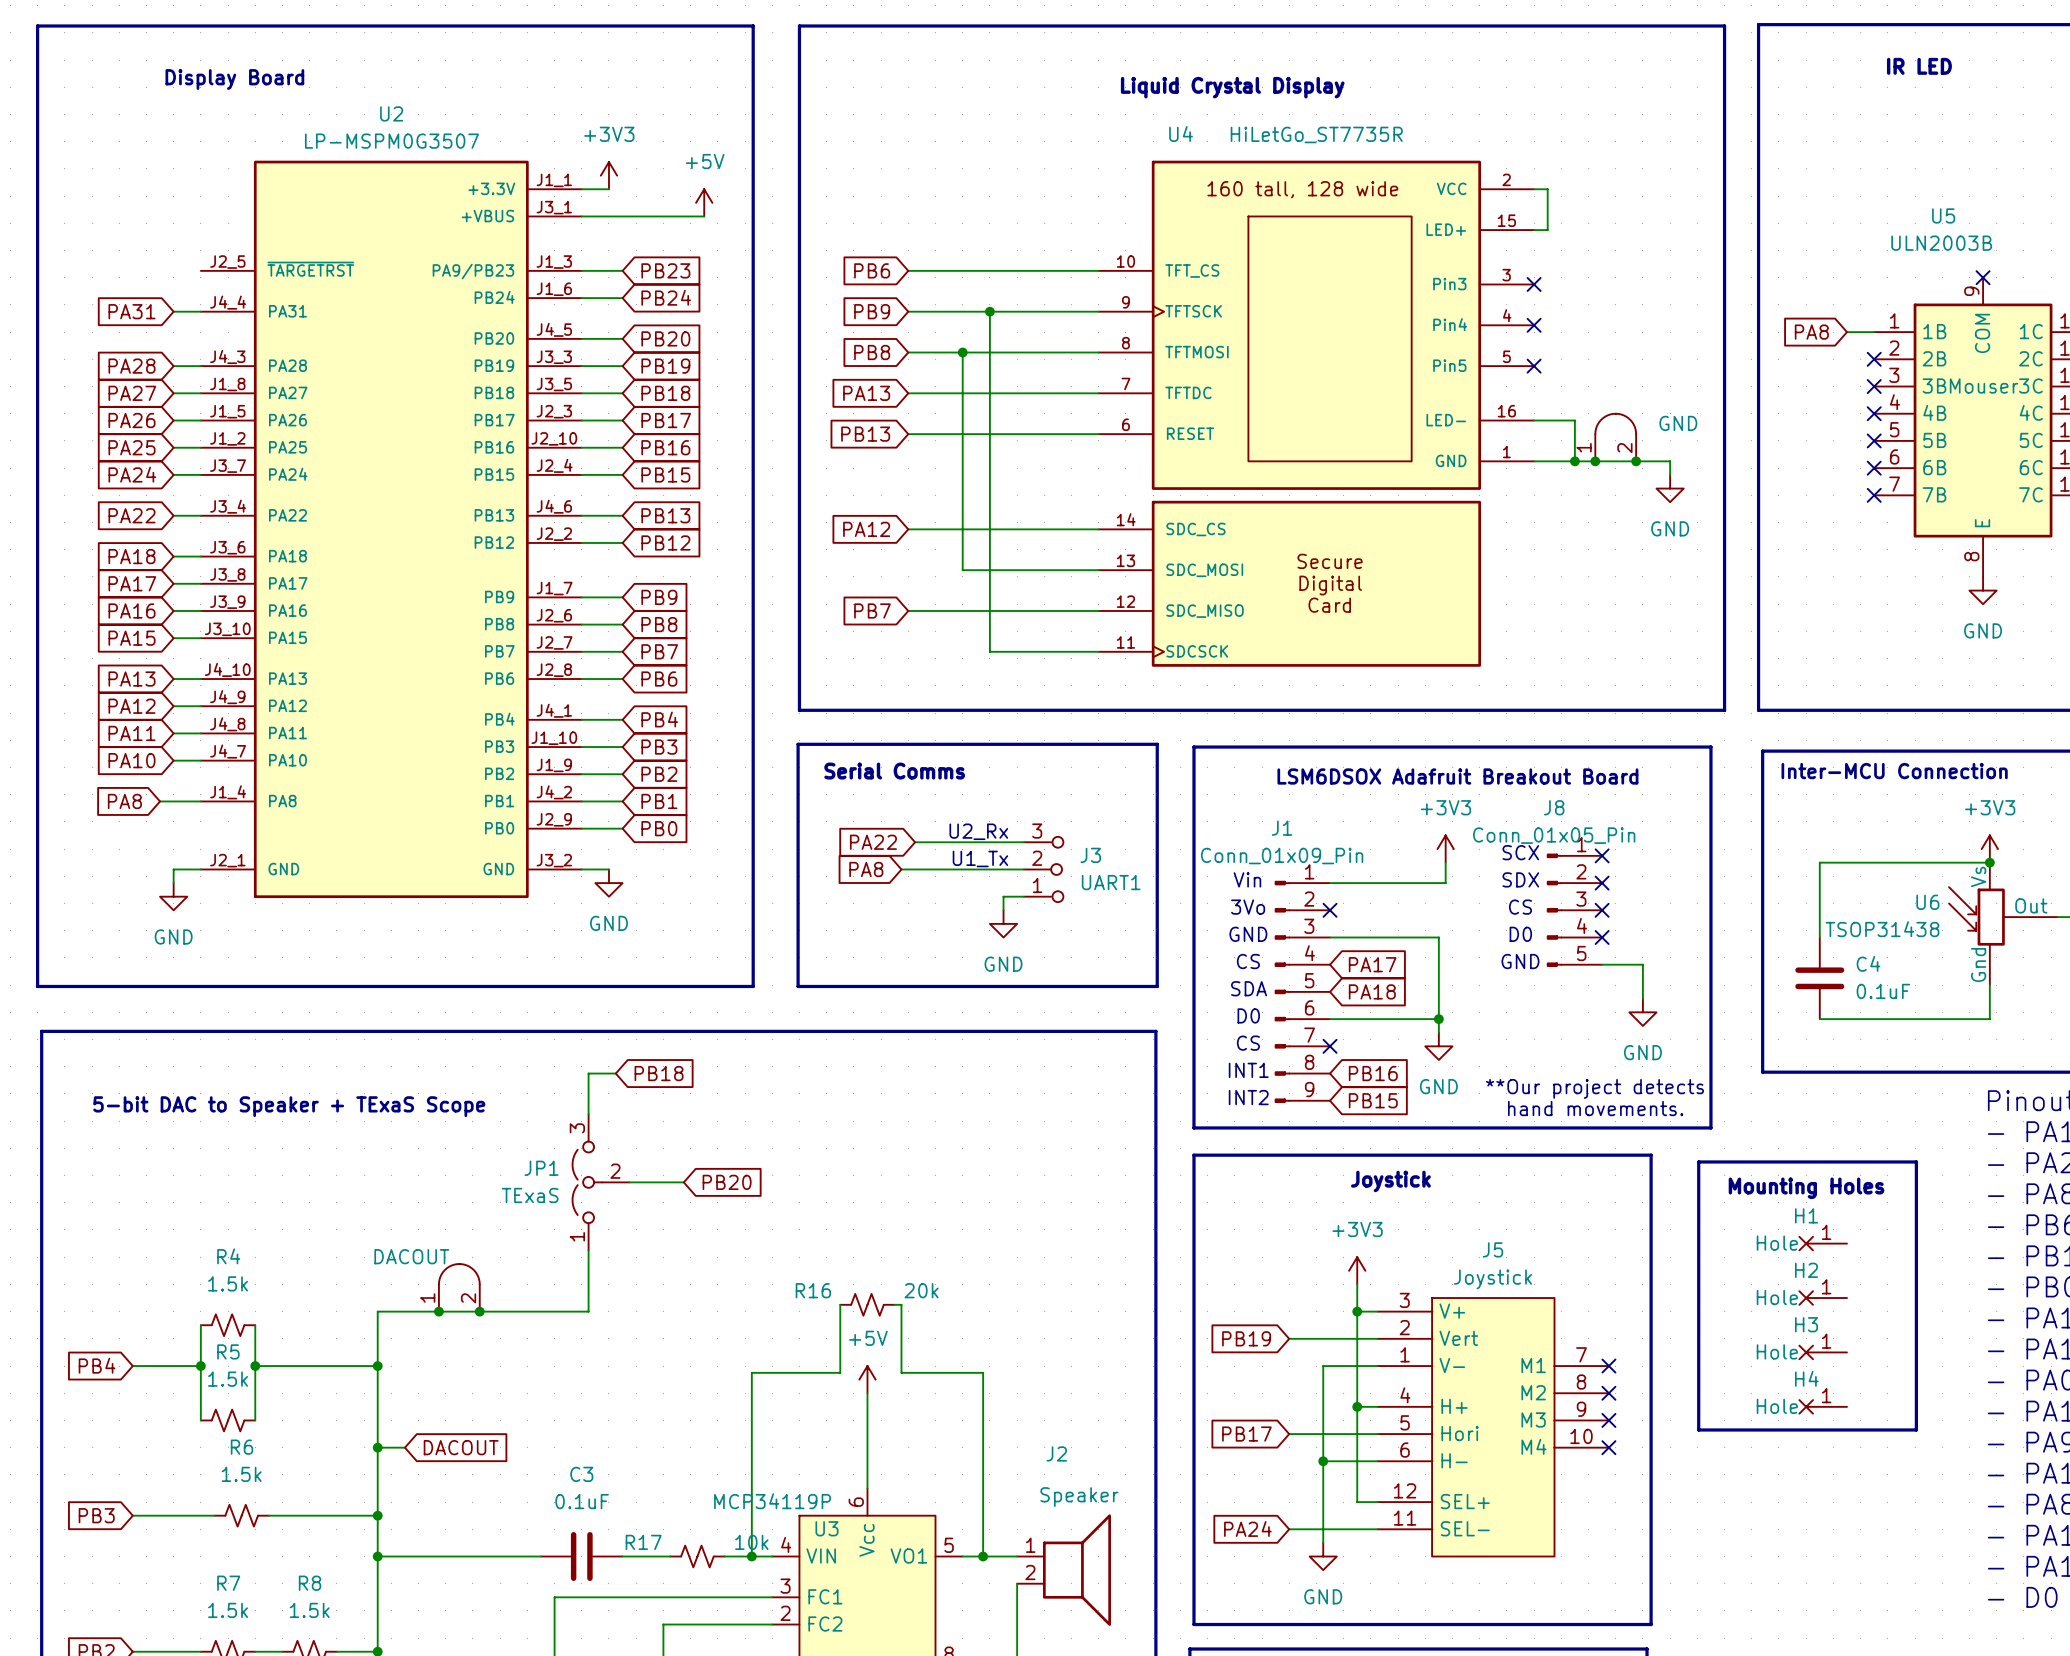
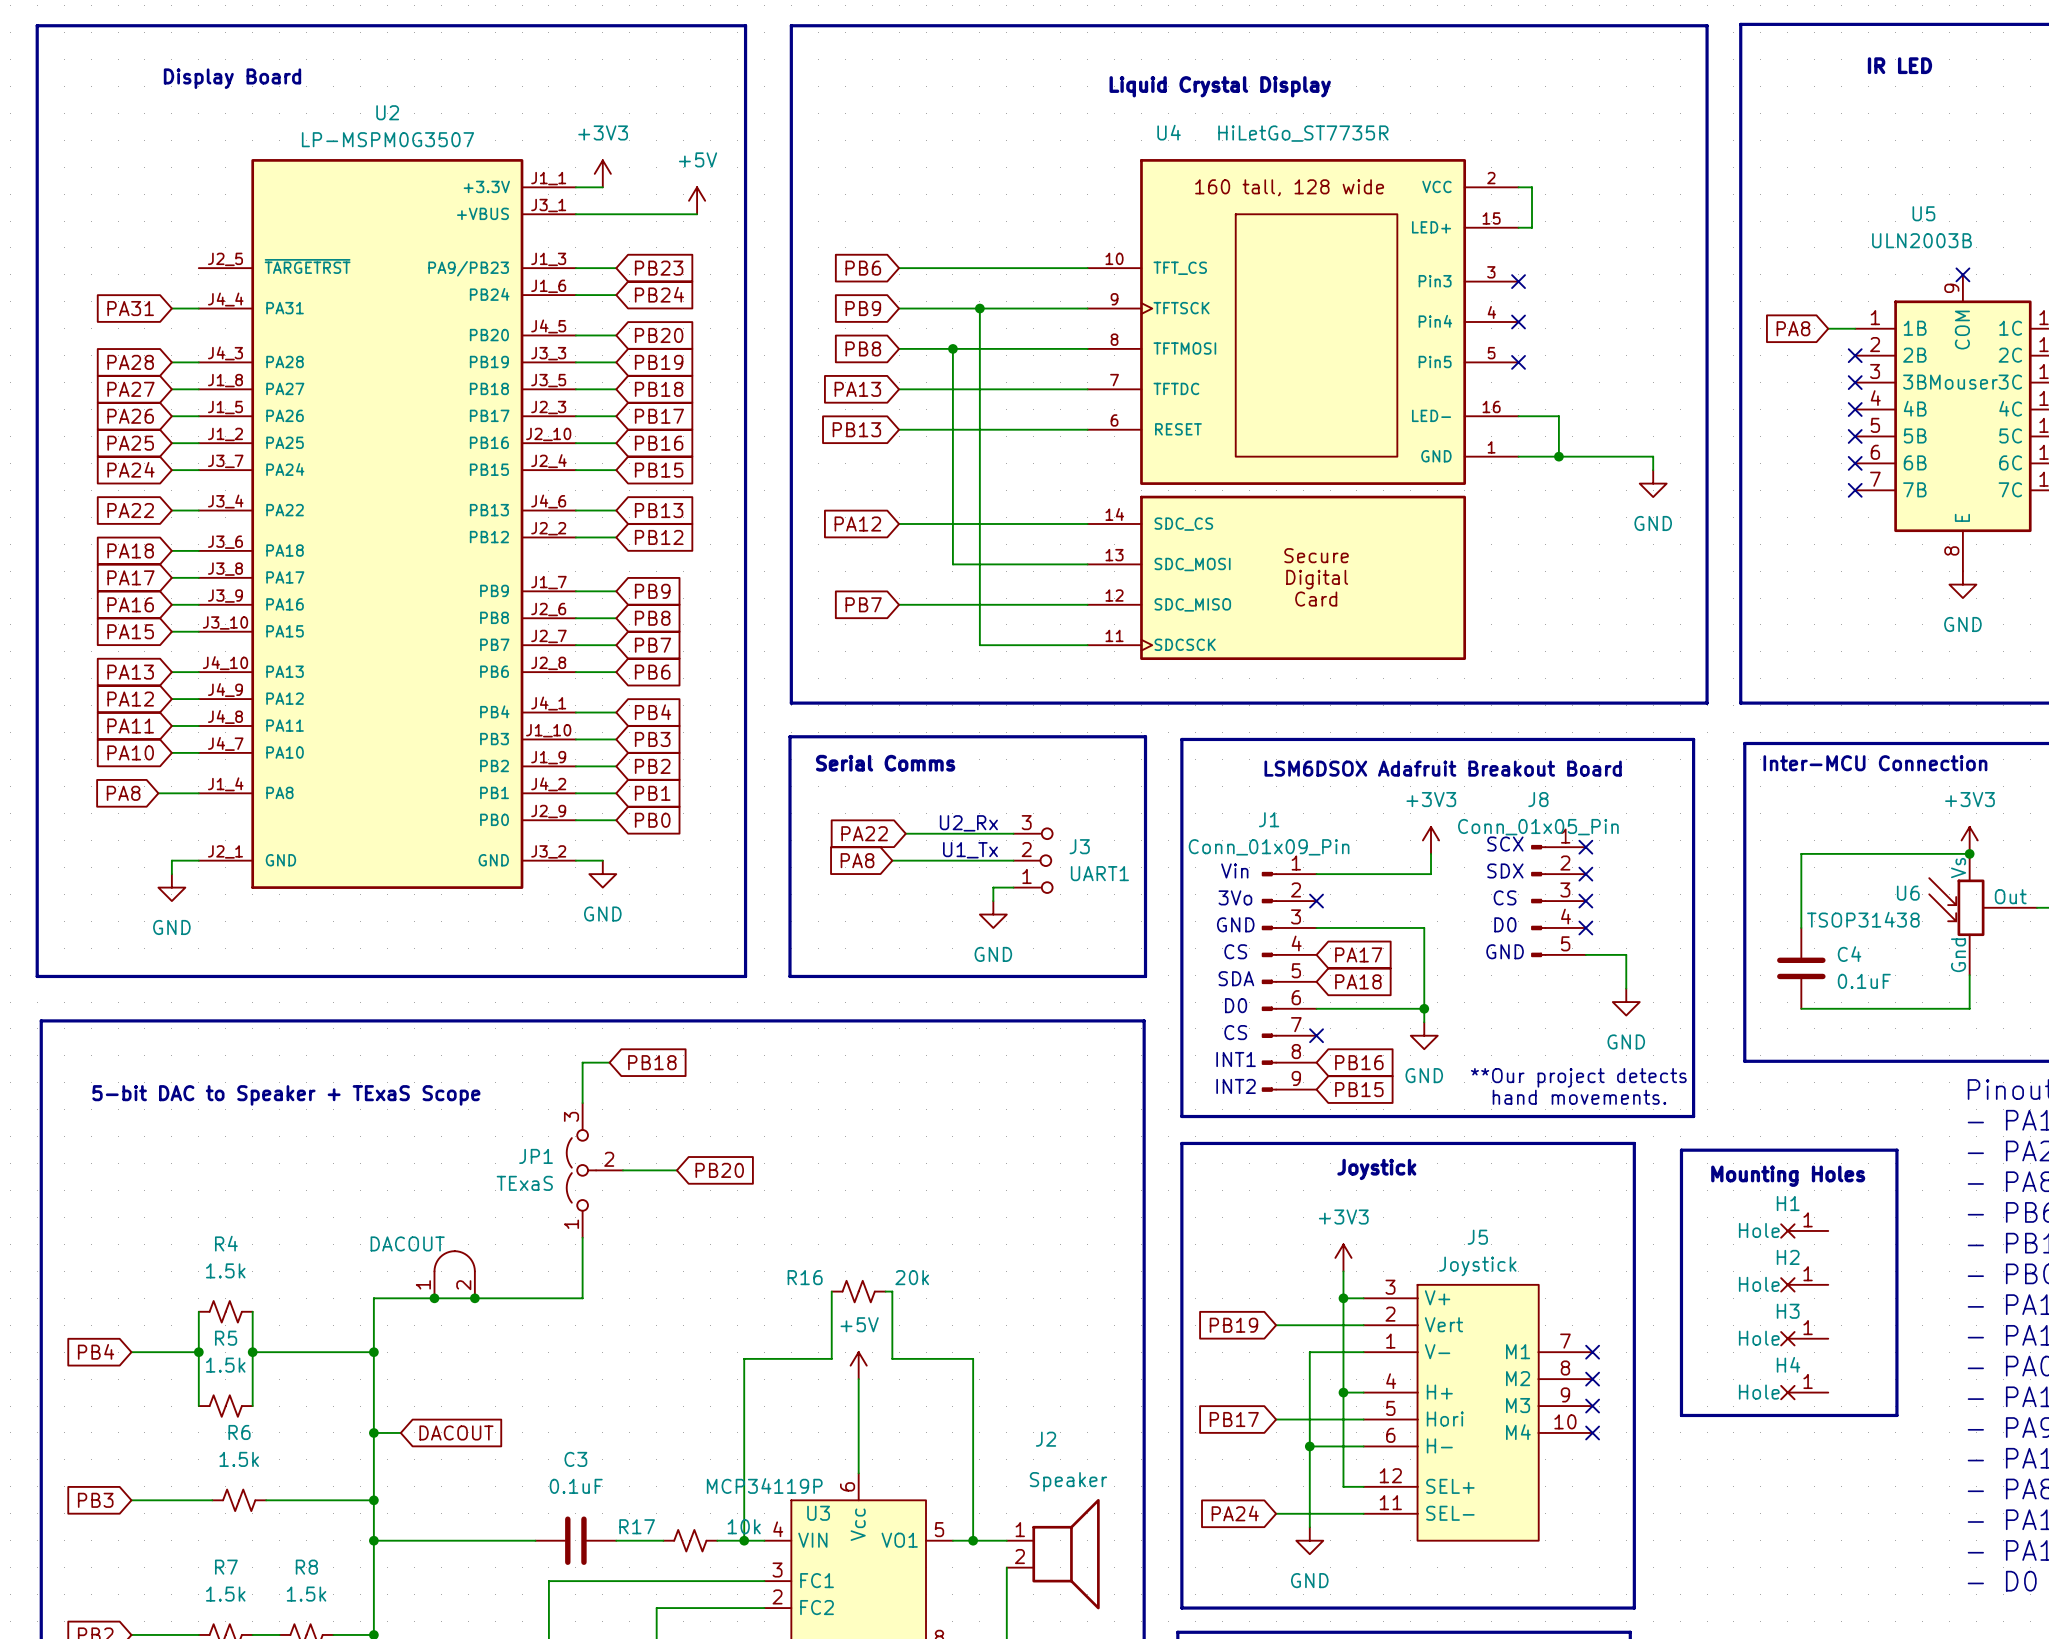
part: GND (1615, 437) -> none
junction: (1595, 461) -> none
junction: (1636, 461) -> none

